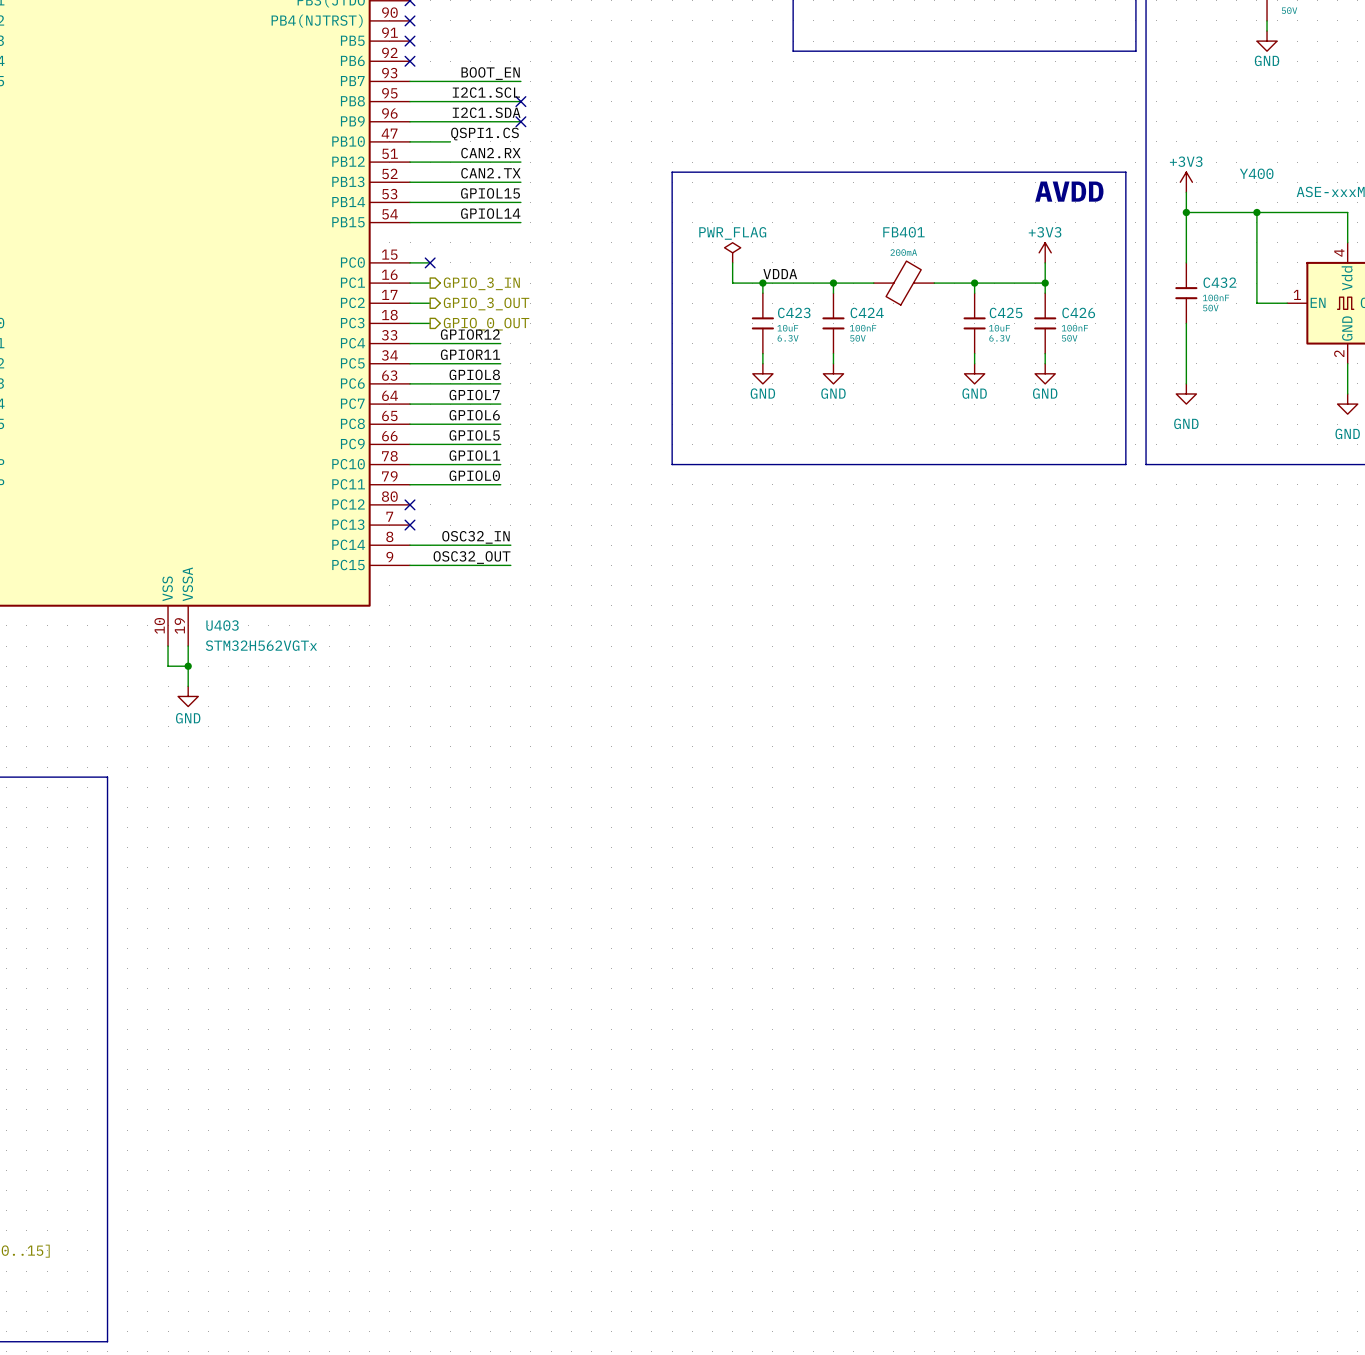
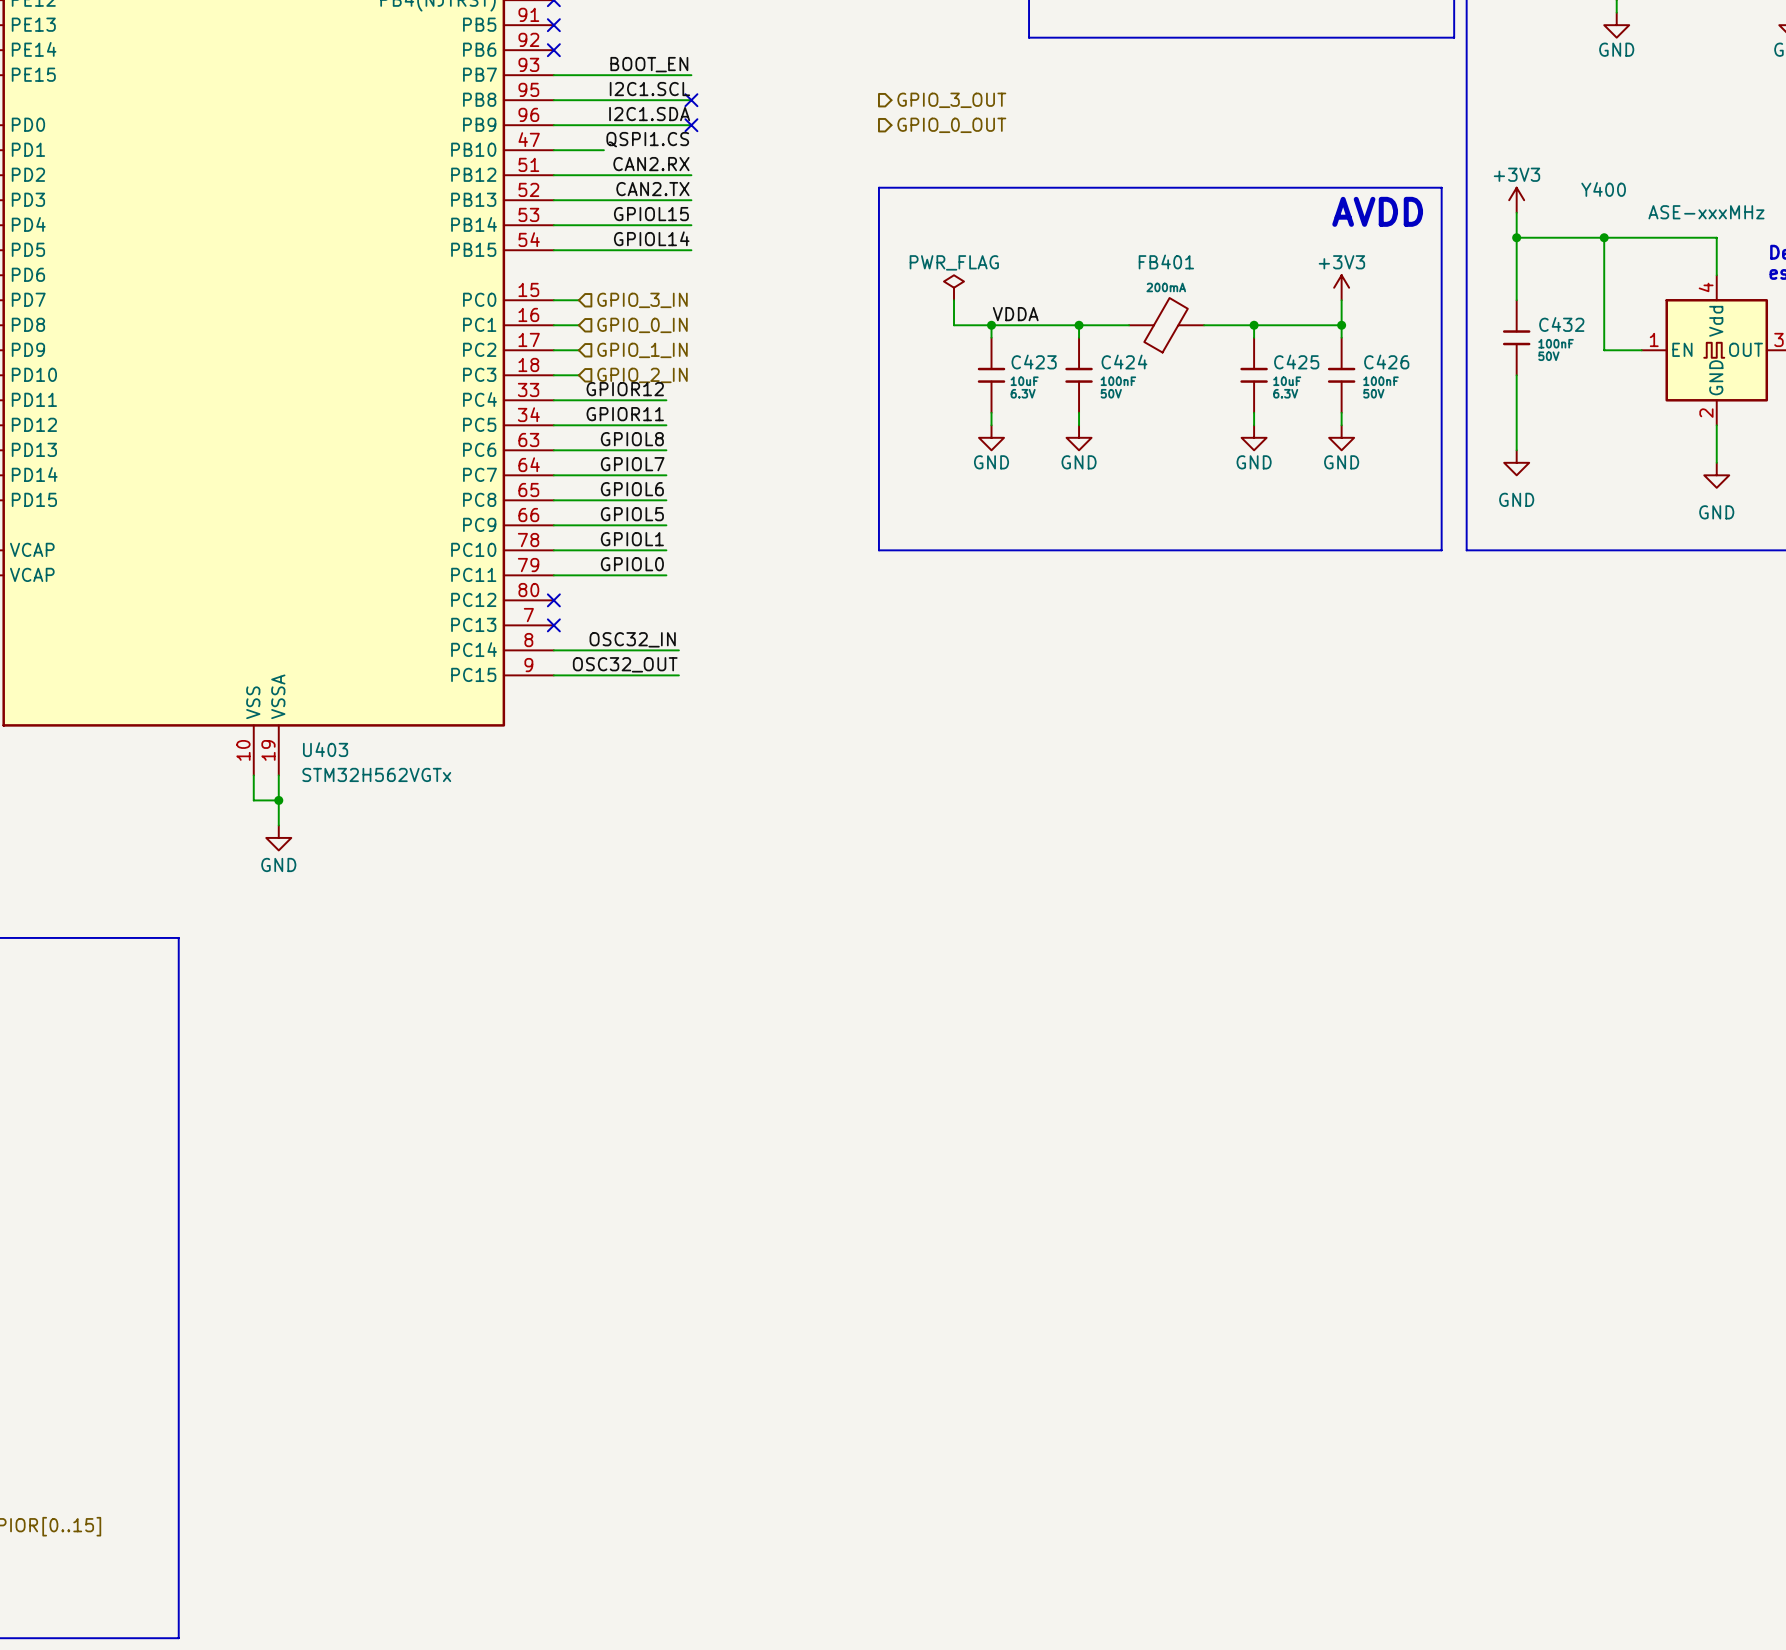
hierarchical label: none -> GPIO_3_OUT (951, 100)
hierarchical label: none -> GPIO_0_OUT (951, 125)
no-connect mark: (430, 262) -> none
hierarchical label: none -> GPIO_3_IN (642, 300)
hierarchical label shape: output (481, 283) -> input (642, 325)
hierarchical label: GPIO_3_IN (481, 283) -> GPIO_0_IN (642, 325)
hierarchical label shape: output (486, 303) -> input (642, 350)
hierarchical label: GPIO_3_OUT (486, 303) -> GPIO_1_IN (642, 350)
hierarchical label shape: output (486, 324) -> input (642, 375)
hierarchical label: GPIO_0_OUT (486, 324) -> GPIO_2_IN (642, 375)

